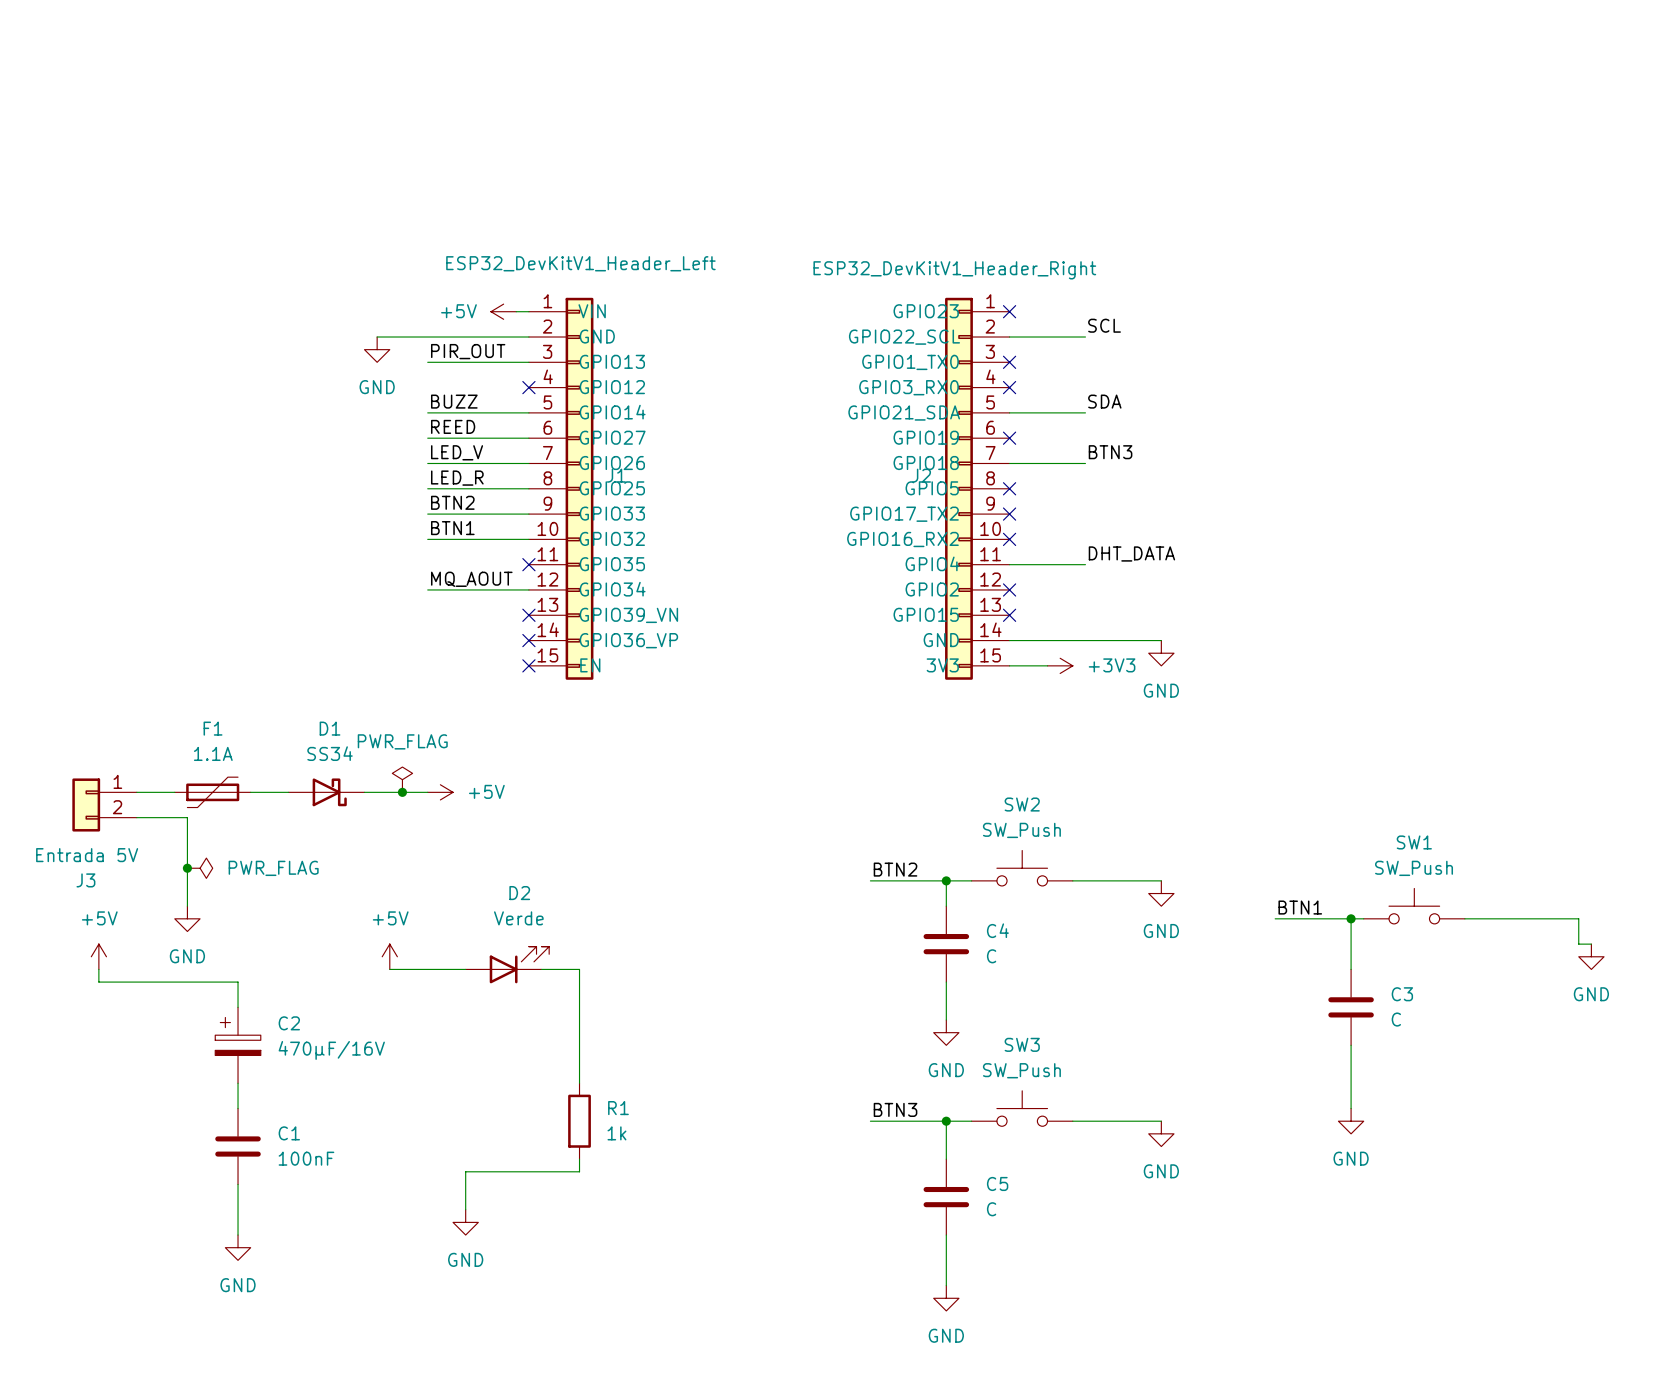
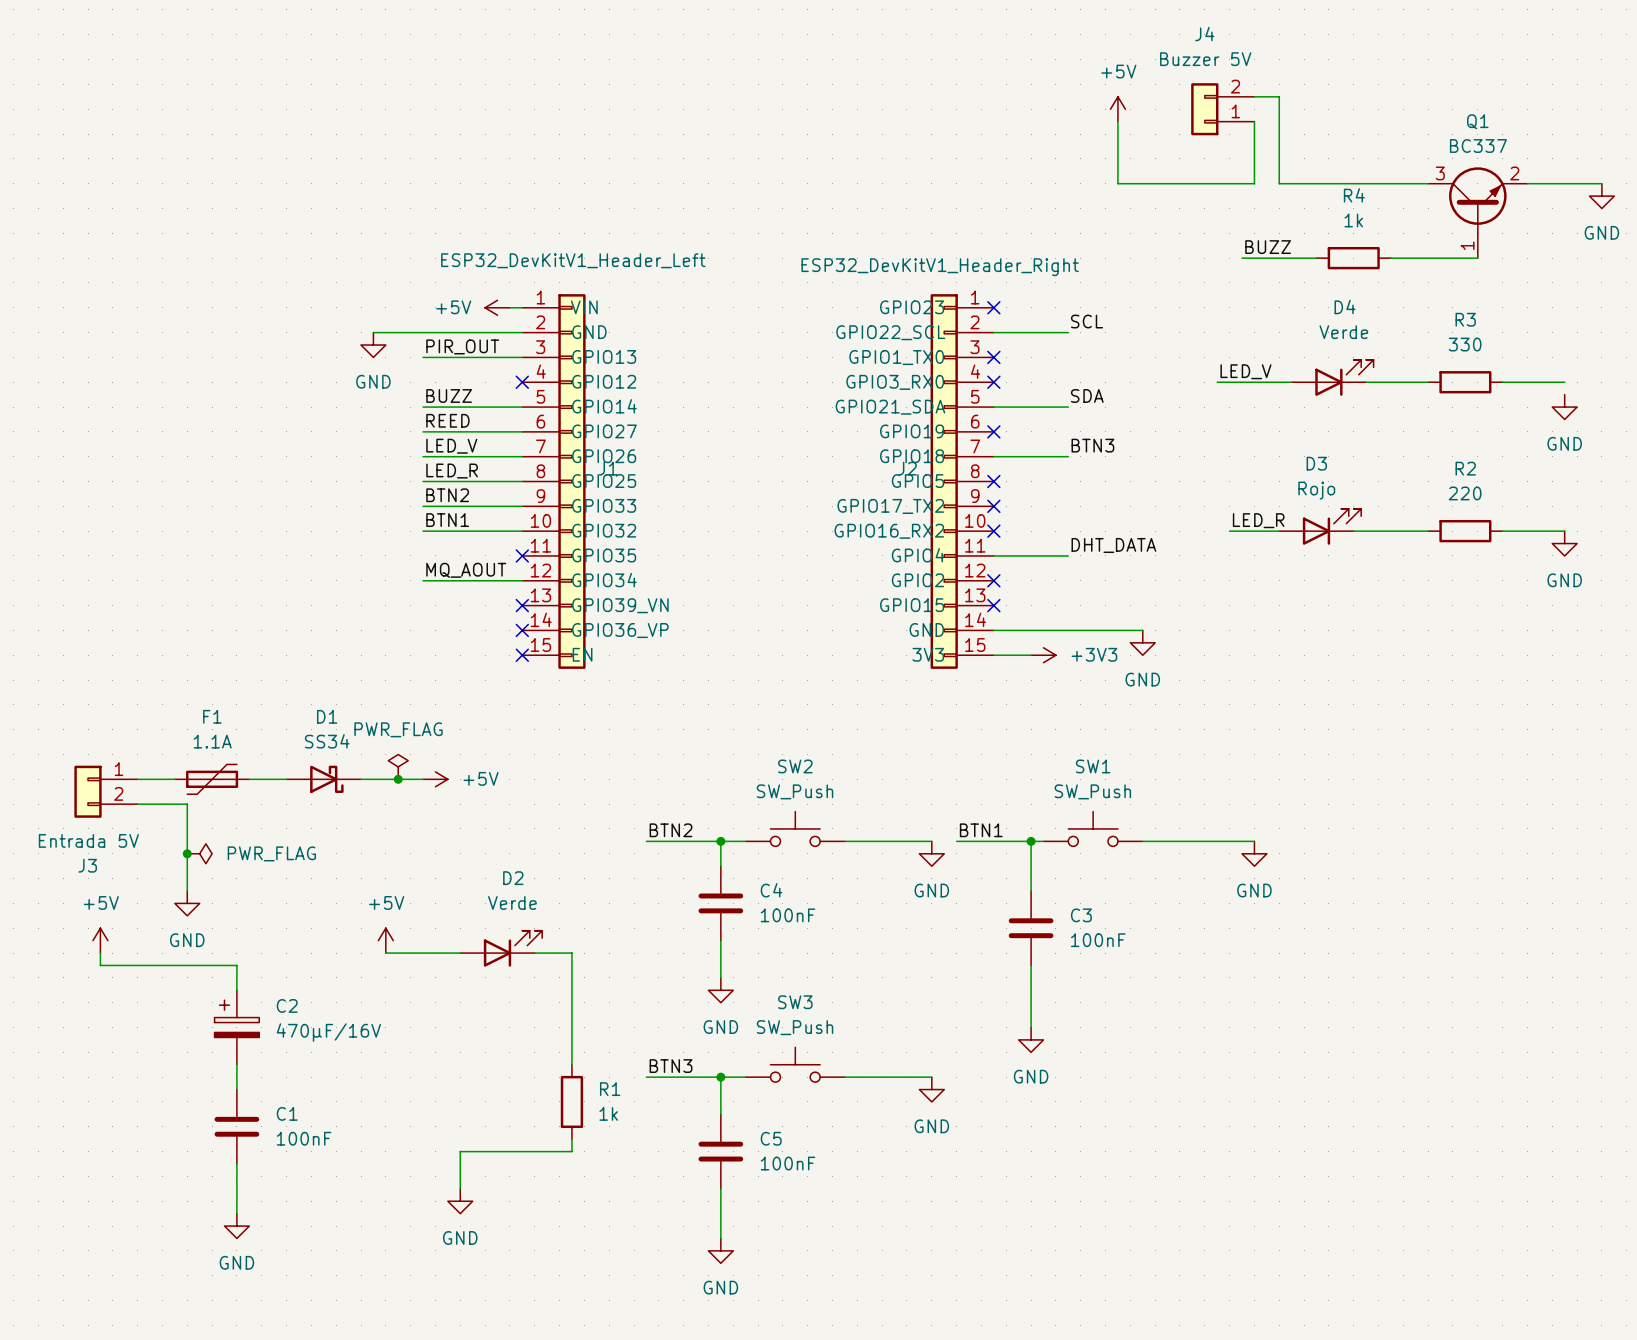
wire: none -> (1254, 96) (1279, 96) (1279, 183) (1428, 183)
power symbol: none -> +5V (1117, 109)
J4: none -> Buzzer 5V (1222, 109)
wire: none -> (1117, 121) (1117, 183) (1254, 183) (1254, 121)
wire: none -> (1527, 183) (1601, 183)
power symbol: none -> GND (1601, 196)
Q1: none -> BC337 (1477, 212)
label: none -> BUZZ (1268, 247)
wire: none -> (1242, 258) (1316, 258)
R4: none -> 1k (1353, 258)
wire: none -> (1390, 258) (1477, 258)
label: none -> LED_V (1245, 371)
D4: none -> Verde (1332, 377)
wire: none -> (1217, 382) (1291, 382)
wire: none -> (1366, 382) (1428, 382)
R3: none -> 330 (1465, 382)
wire: none -> (1502, 382) (1564, 382)
power symbol: none -> GND (1564, 407)
label: none -> LED_R (1258, 520)
D3: none -> Rojo (1320, 526)
wire: none -> (1229, 531) (1279, 531)
wire: none -> (1353, 531) (1428, 531)
R2: none -> 220 (1465, 531)
wire: none -> (1502, 531) (1564, 531)
power symbol: none -> GND (1564, 543)
label: none -> BTN1 (981, 830)
junction: none -> (720, 841)
wire: none -> (956, 841) (1043, 841)
wire: none -> (1031, 841) (1031, 891)
junction: none -> (1031, 841)
wire: none -> (1142, 841) (1254, 841)
power symbol: none -> GND (931, 853)
SW2 position: (1022, 868) -> (795, 828)
power symbol: none -> GND (1254, 853)
label position: BTN2 (895, 869) -> BTN2 (671, 830)
wire: (870, 880) (971, 880) -> (646, 841) (745, 841)
wire: (946, 880) (946, 906) -> (720, 841) (720, 866)
junction: (946, 880) -> none
wire: (1072, 880) (1161, 880) -> (844, 841) (931, 841)
power symbol: GND (1161, 893) -> none
SW1 position: (1414, 906) -> (1093, 828)
label: BTN1 (1300, 907) -> none
wire: (1275, 918) (1363, 918) -> none
wire: (1351, 918) (1351, 969) -> none
junction: (1351, 918) -> none
wire: (1464, 918) (1578, 918) (1578, 944) (1591, 944) -> none
C4 position: (946, 944) -> (720, 903)
C4 value: C (991, 956) -> 100nF (788, 915)
power symbol: GND (1591, 956) -> none
wire: (946, 982) (946, 1020) -> (720, 940) (720, 977)
wire: none -> (1031, 965) (1031, 1027)
power symbol: none -> GND (720, 990)
C3 position: (1351, 1007) -> (1031, 928)
C3 value: C (1396, 1019) -> 100nF (1098, 940)
power symbol: GND (946, 1032) -> none
wire: (1351, 1045) (1351, 1108) -> none
power symbol: none -> GND (1031, 1039)
junction: none -> (720, 1077)
power symbol: none -> GND (931, 1089)
SW3 position: (1022, 1108) -> (795, 1064)
label position: BTN3 (895, 1109) -> BTN3 (671, 1066)
wire: (870, 1121) (971, 1121) -> (646, 1077) (745, 1077)
wire: (946, 1121) (946, 1159) -> (720, 1077) (720, 1114)
junction: (946, 1121) -> none
wire: (1072, 1121) (1161, 1121) -> (844, 1077) (931, 1077)
power symbol: GND (1351, 1121) -> none
power symbol: GND (1161, 1133) -> none
C5 position: (946, 1197) -> (720, 1151)
C5 value: C (991, 1209) -> 100nF (788, 1163)
wire: (946, 1235) (946, 1285) -> (720, 1188) (720, 1238)
power symbol: none -> GND (720, 1250)
power symbol: GND (946, 1298) -> none

